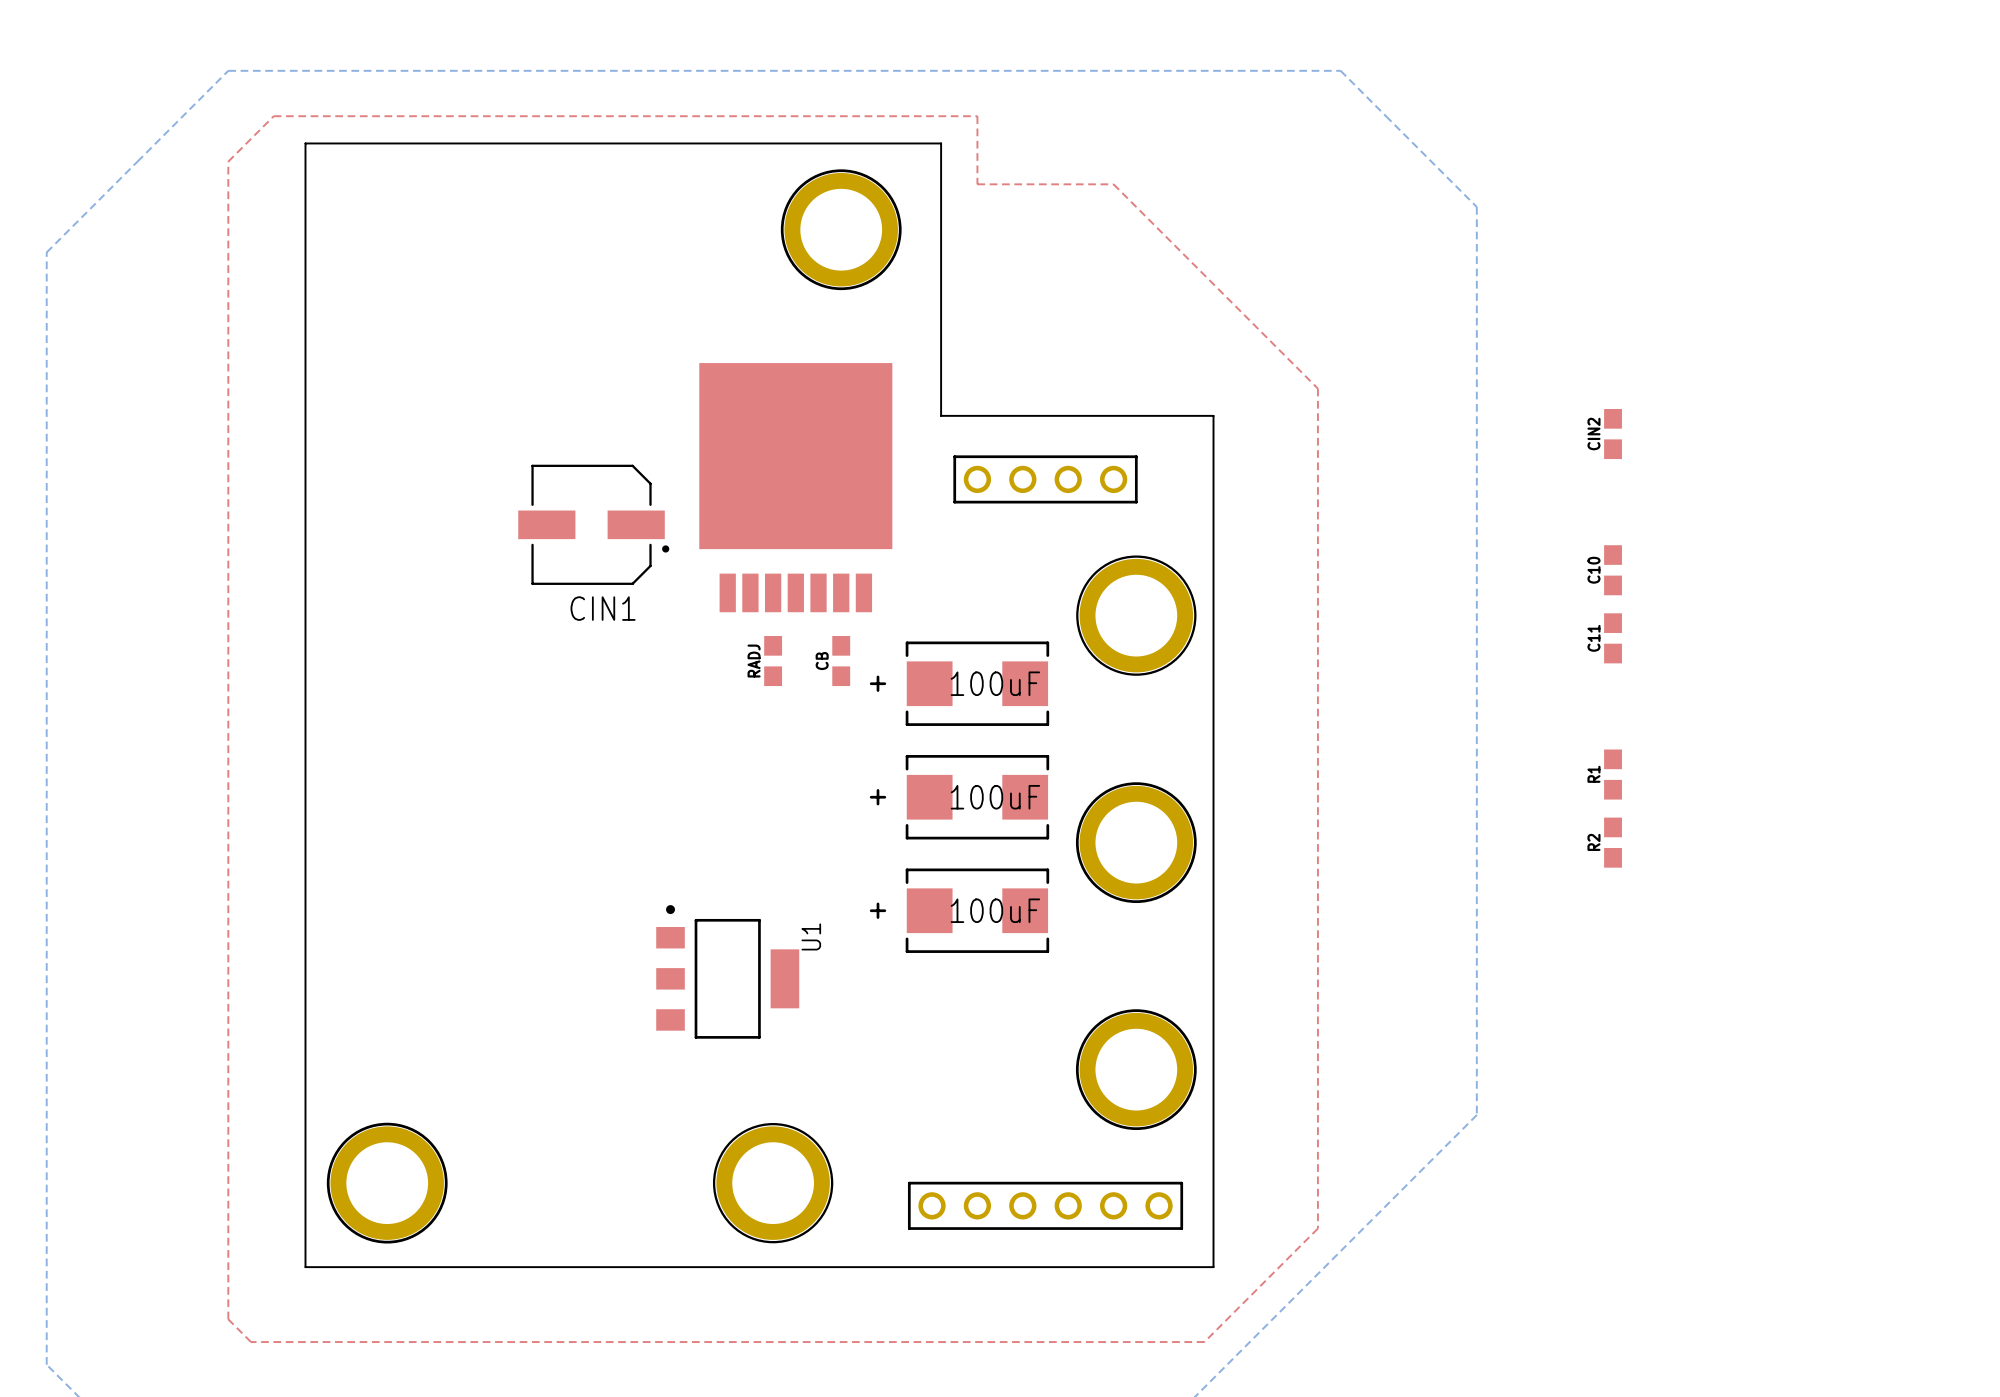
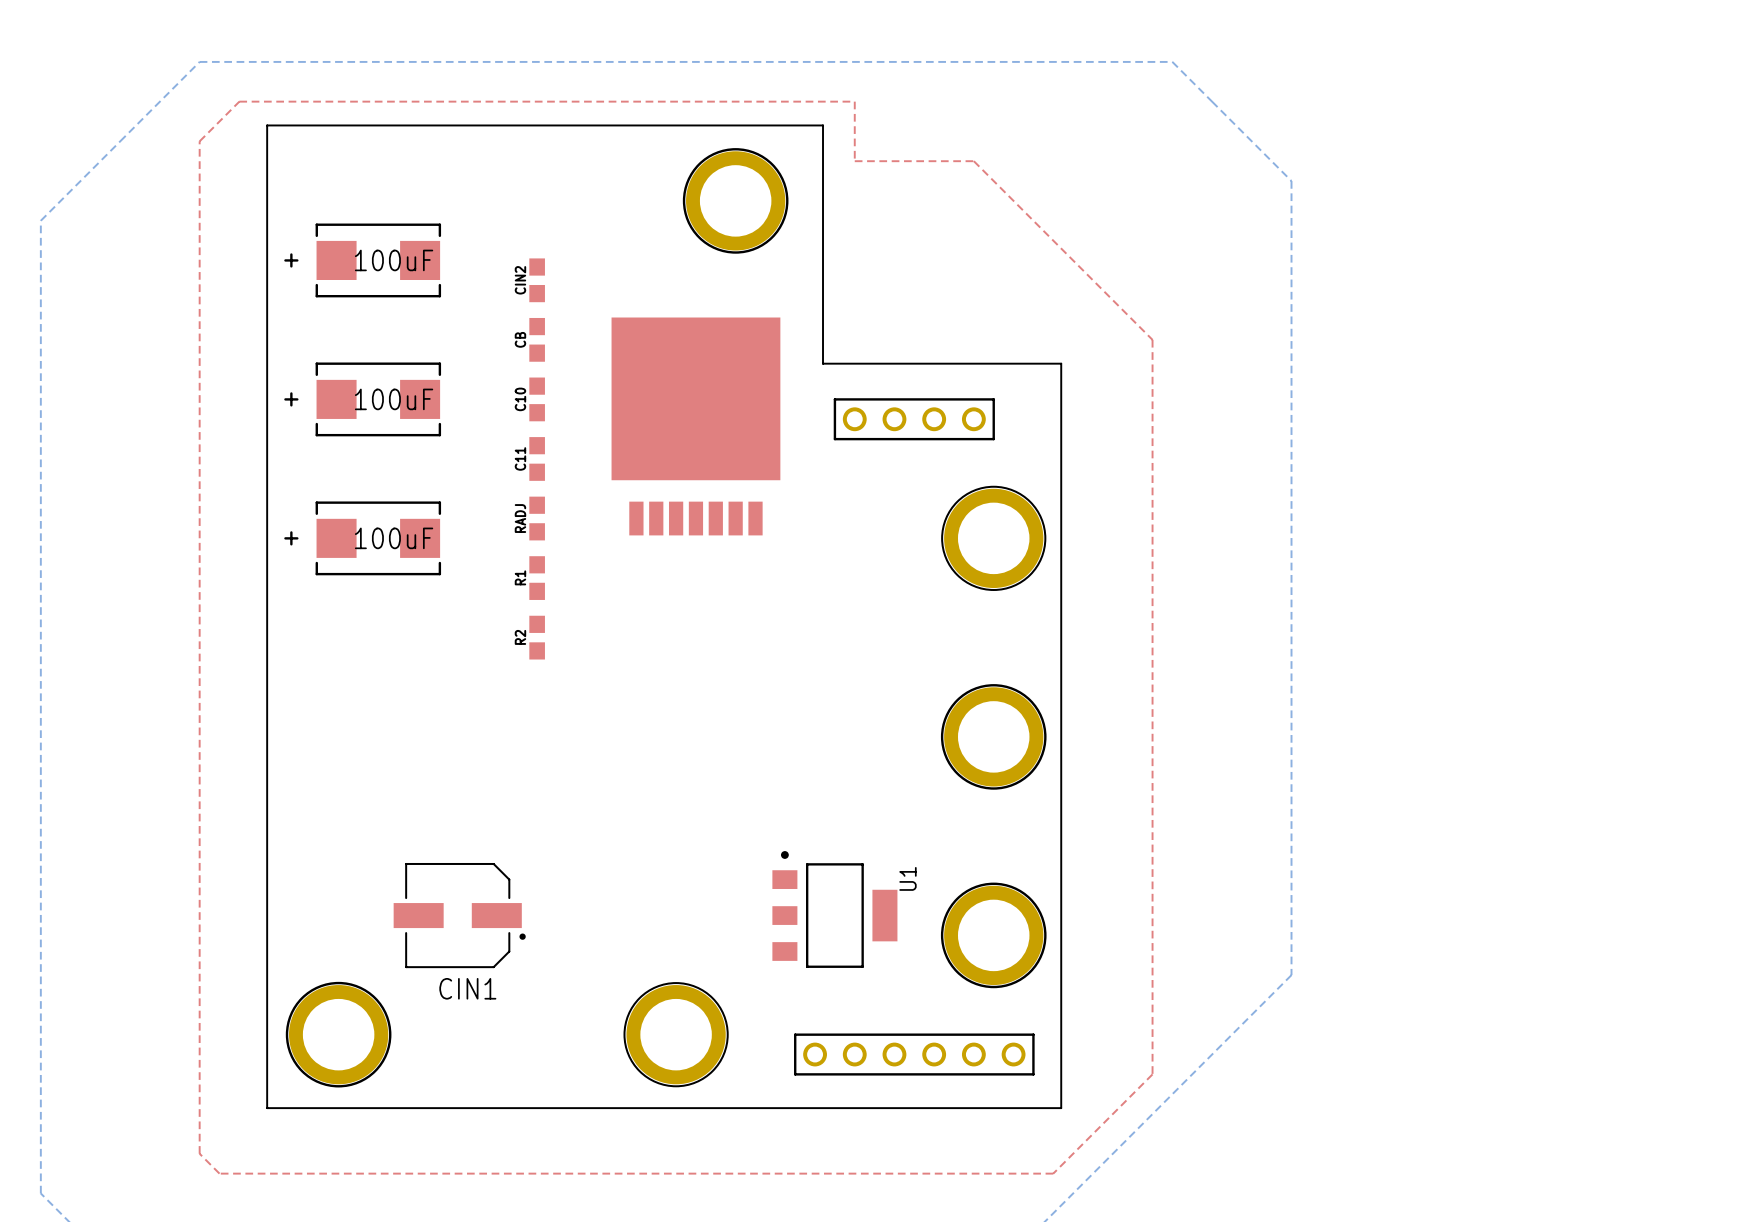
part: none -> 100uF (362, 260)
CIN2 position: (1613, 434) -> (537, 280)
part: none -> 100uF (362, 399)
CIN1 position: (593, 524) -> (459, 915)
C10 position: (1613, 570) -> (537, 399)
part: none -> 100uF (362, 538)
C11 position: (1613, 638) -> (537, 458)
RADJ position: (773, 661) -> (537, 518)
CB position: (841, 661) -> (537, 339)
part: 100uF (959, 683) -> none
R1 position: (1613, 774) -> (537, 578)
part: 100uF (959, 797) -> none
R2 position: (1613, 842) -> (537, 637)
part: 100uF (959, 910) -> none
U1 position: (727, 971) -> (834, 909)

